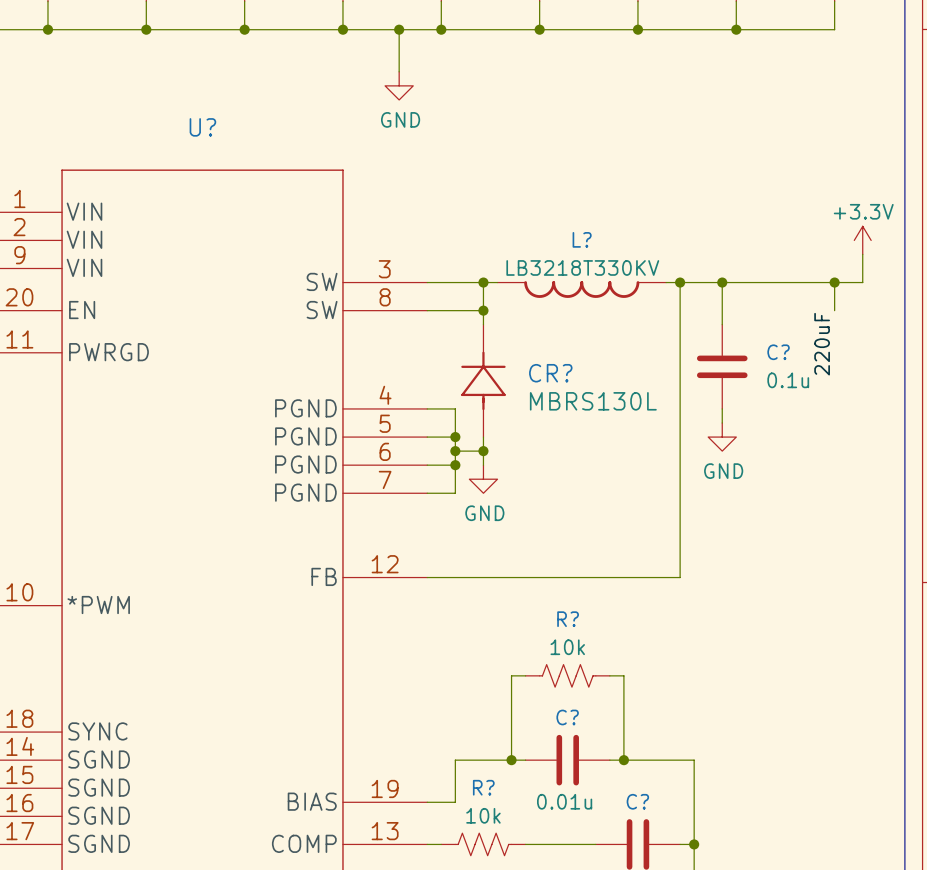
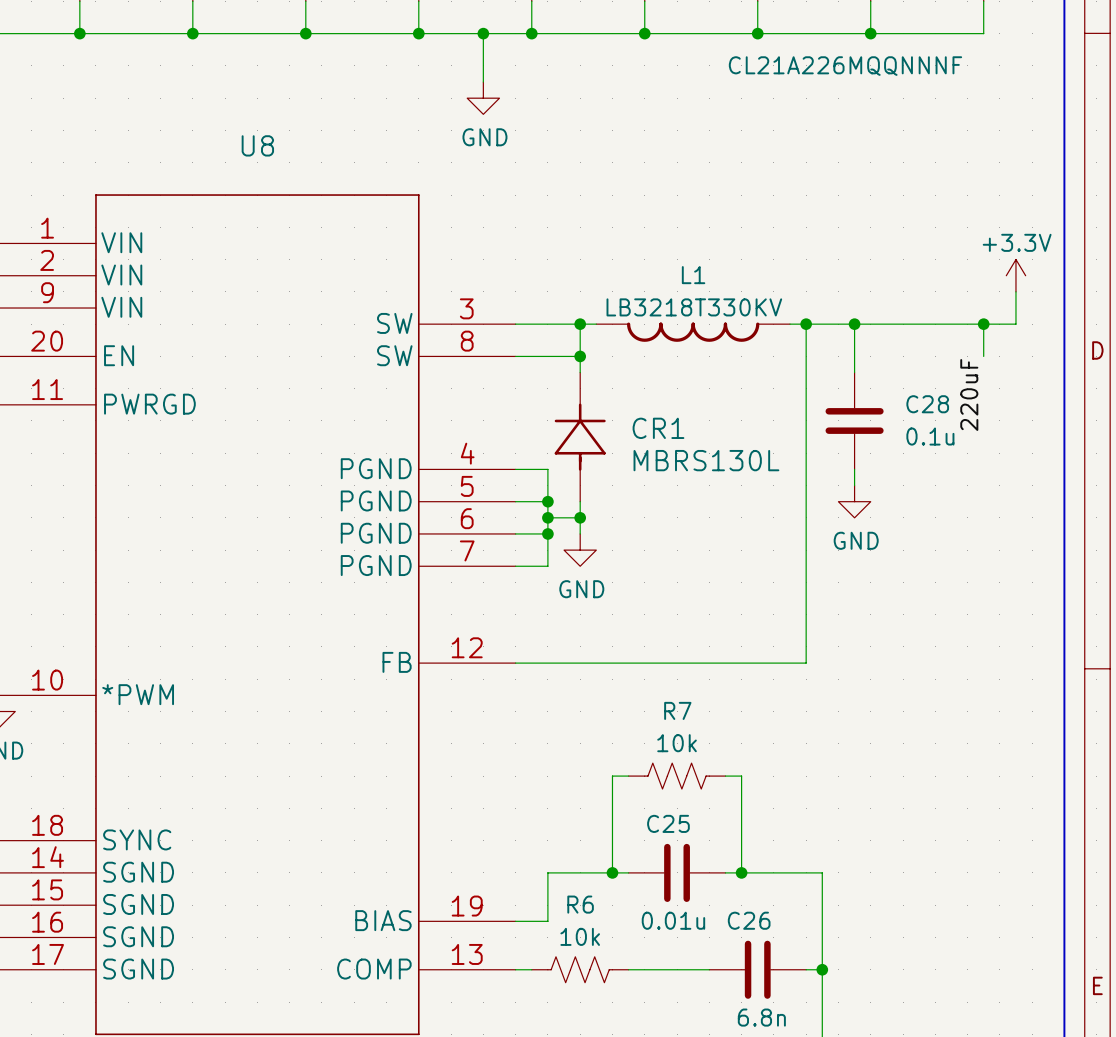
part value: none -> CL21A226MQQNNNF (845, 66)
U? name: U? (202, 127) -> U8 (257, 145)
L? name: L? (582, 239) -> L1 (693, 275)
C? name: C? (778, 352) -> C28 (927, 404)
CR? name: CR? (550, 373) -> CR1 (658, 428)
R? name: R? (568, 619) -> R7 (677, 710)
C? name: C? (567, 717) -> C25 (668, 823)
R? name: R? (483, 787) -> R6 (580, 904)
C? name: C? (637, 801) -> C26 (749, 920)

